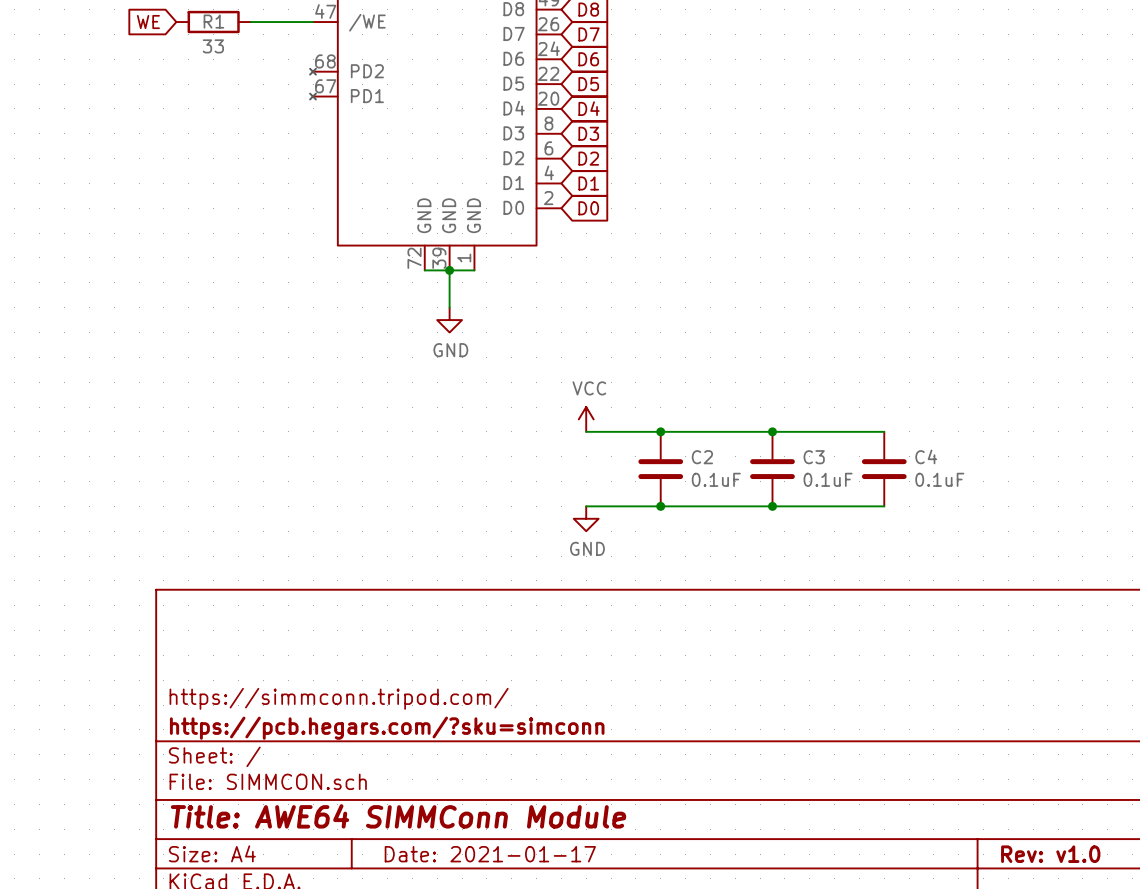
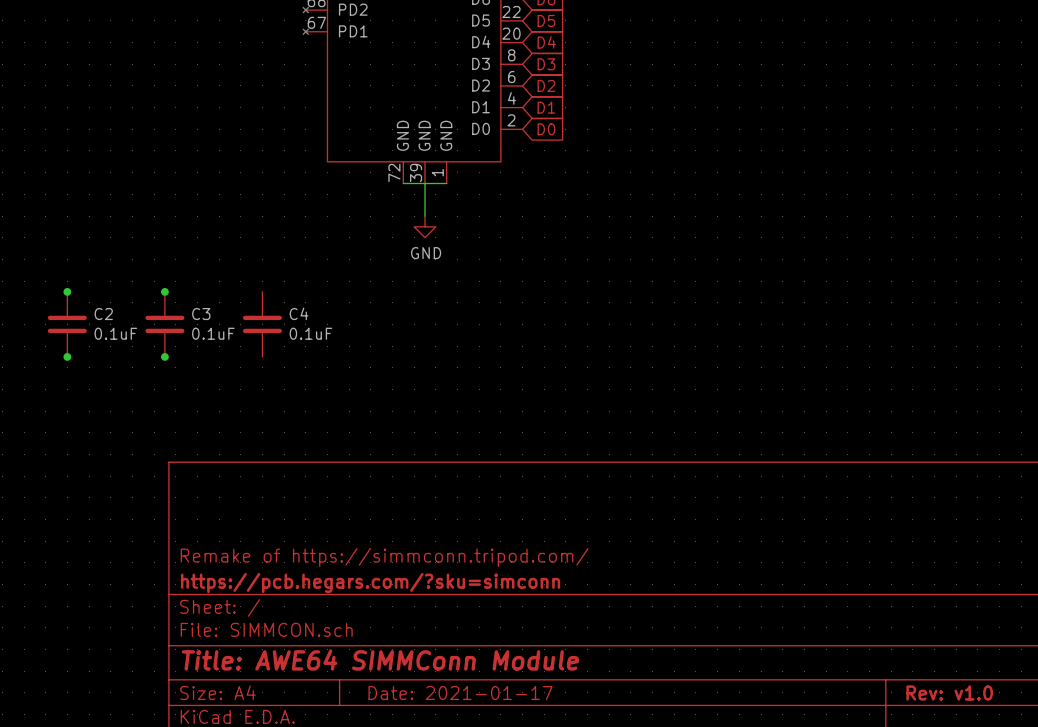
junction: (449, 270) -> none
junction: none -> (67, 291)
junction: none -> (164, 291)
power symbol: VCC (586, 419) -> none
wire: (586, 431) (884, 431) -> none
junction: (660, 431) -> none
junction: (772, 431) -> none
junction: none -> (67, 356)
junction: none -> (164, 356)
C2 position: (660, 469) -> (67, 324)
C3 position: (772, 469) -> (164, 324)
C4 position: (884, 469) -> (262, 324)
wire: (586, 506) (884, 506) -> none
junction: (660, 506) -> none
junction: (772, 506) -> none
power symbol: GND (586, 518) -> none
title block: https://simmconn.tripod.com/ (339, 698) -> Remake of https://simmconn.tripod.com/ (384, 557)

